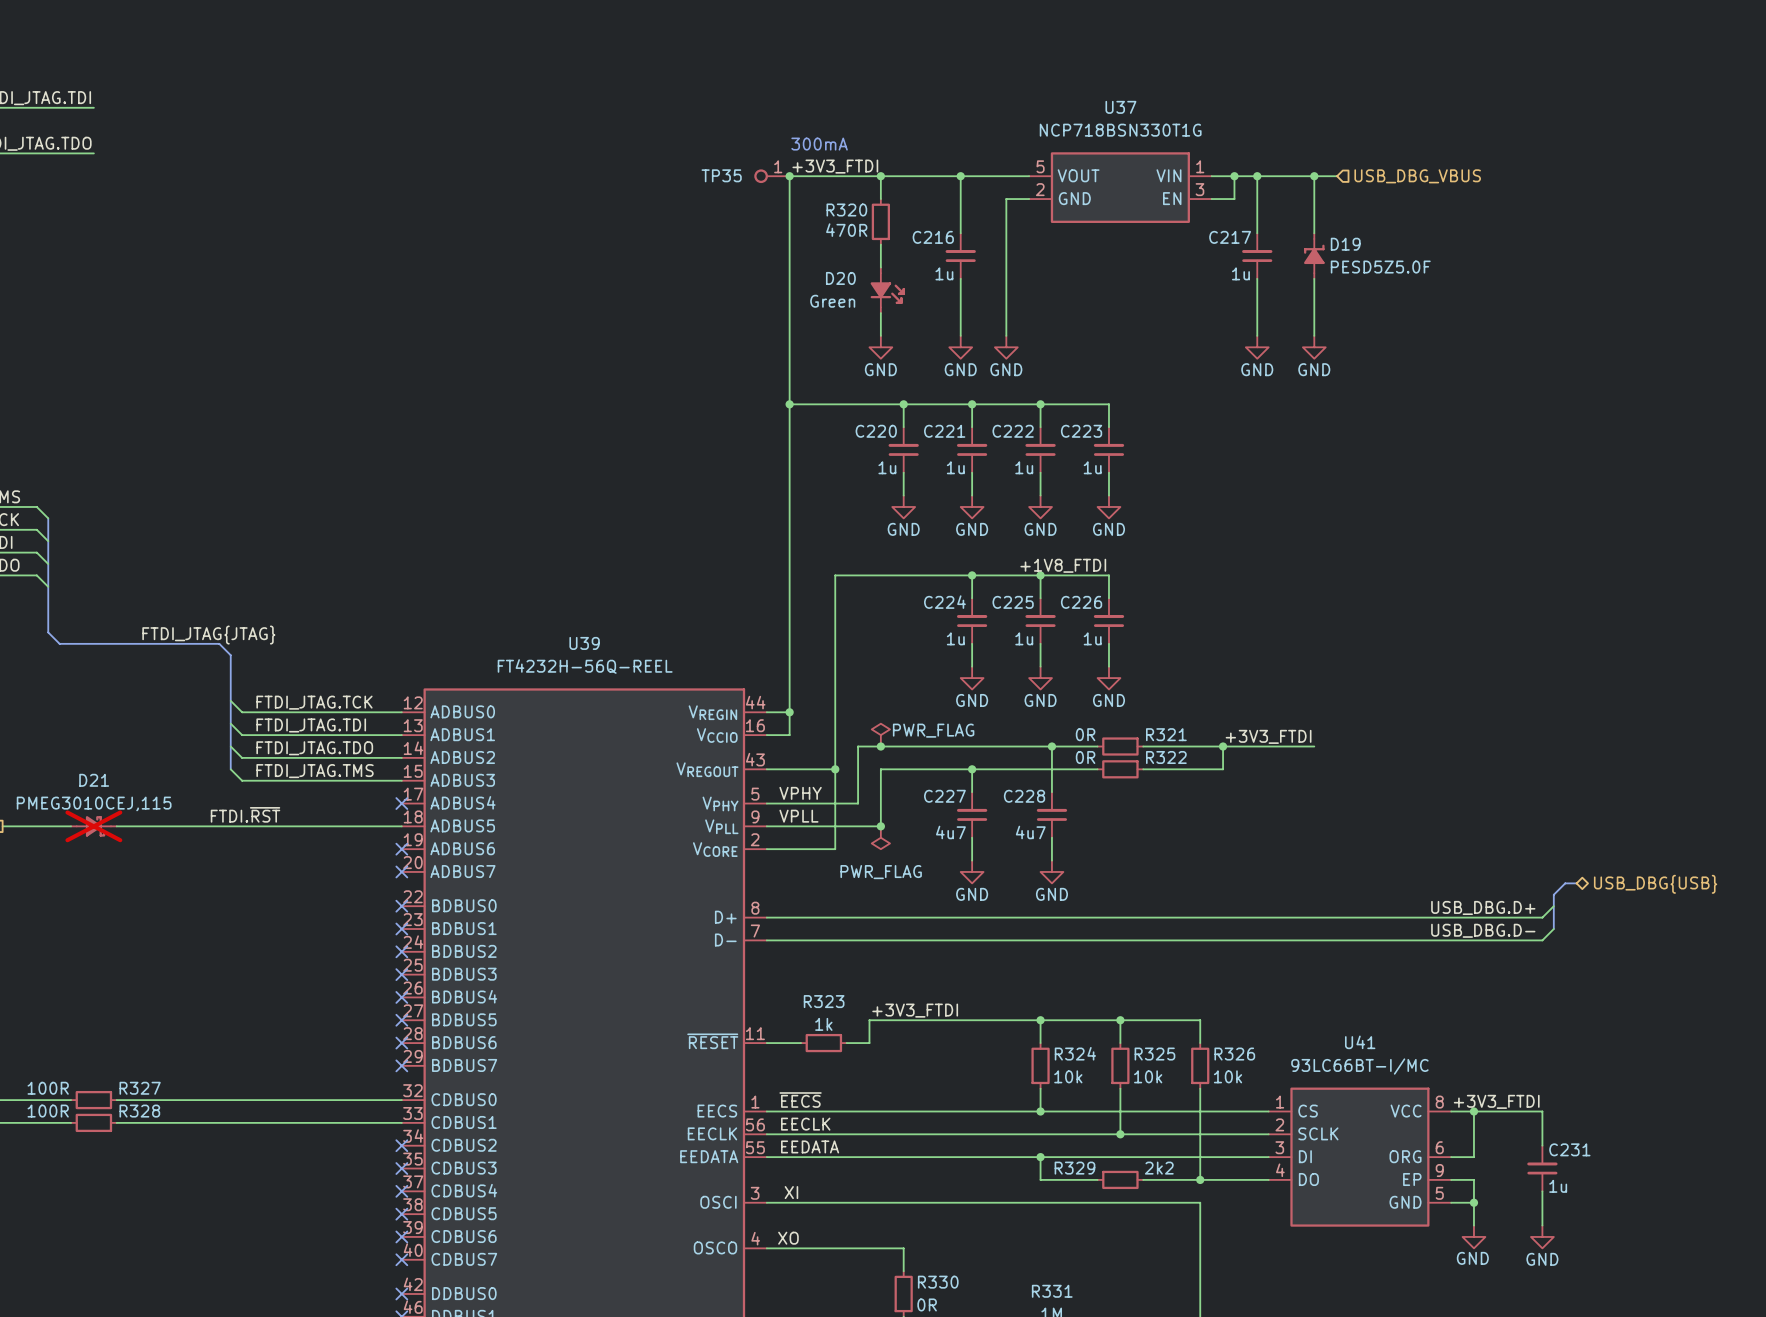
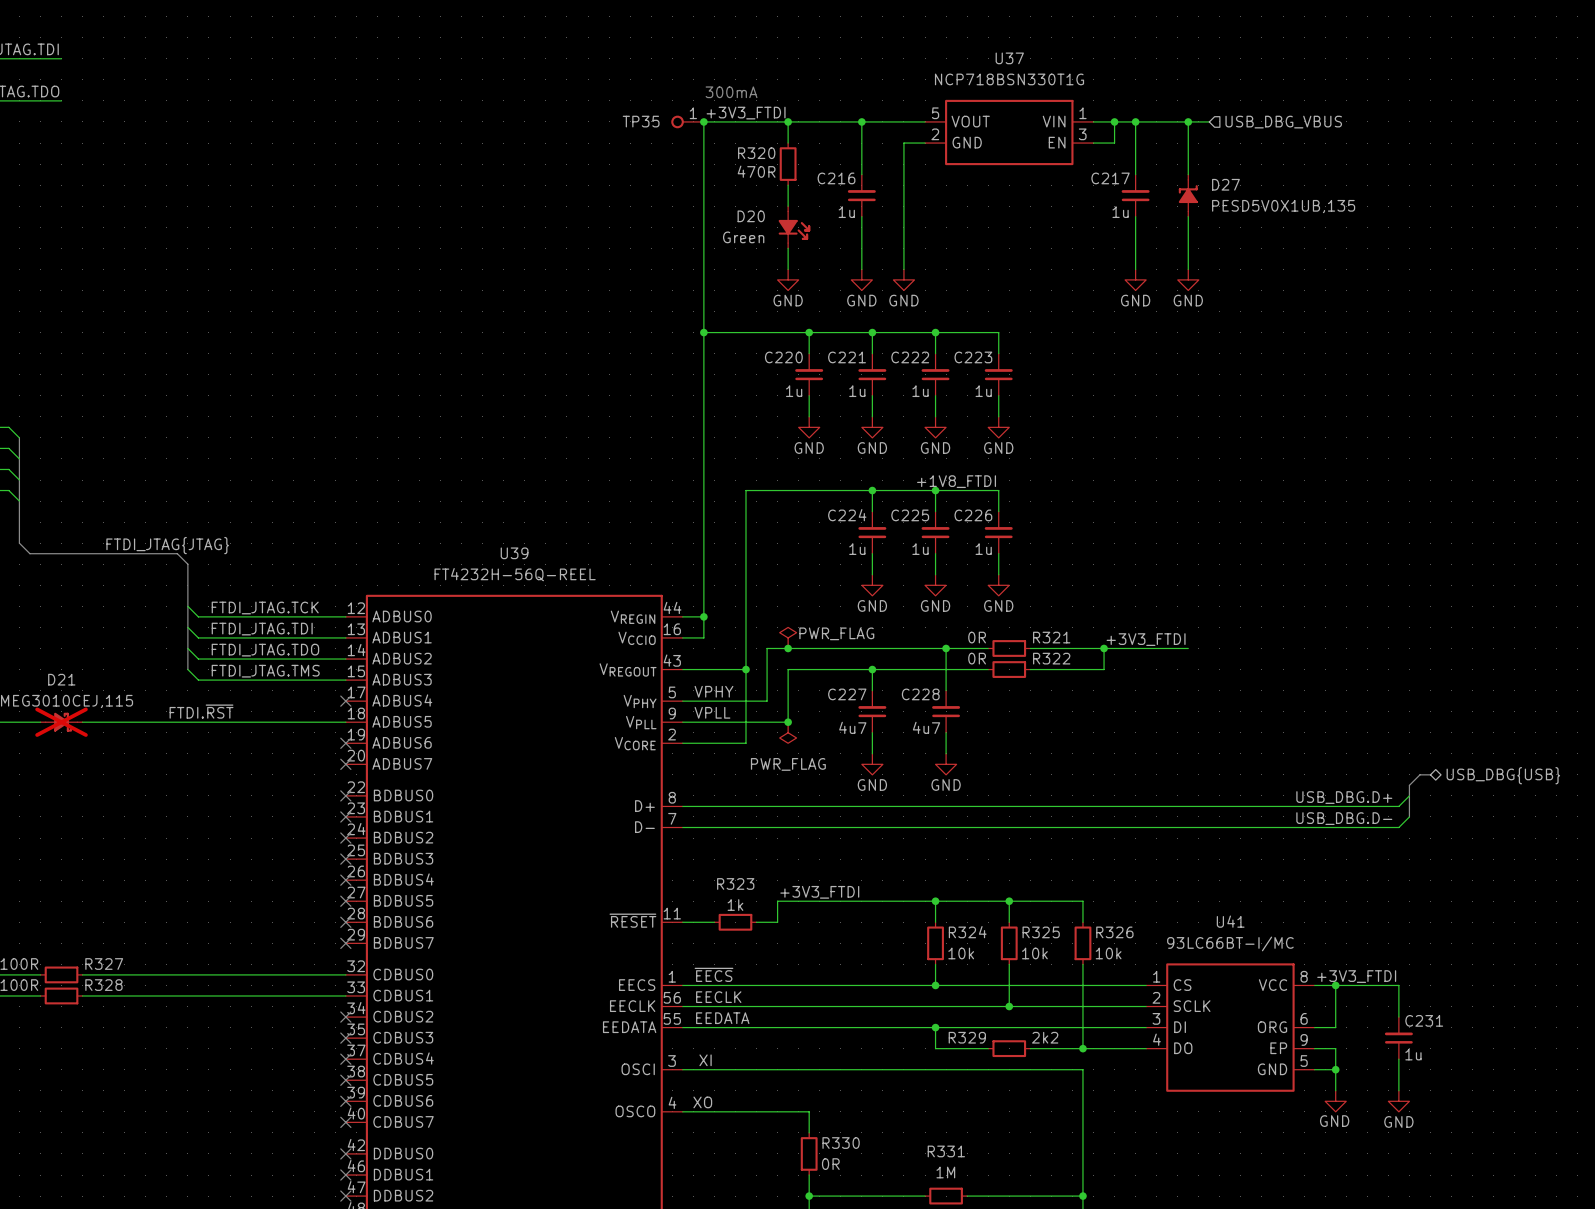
D19 name: D19 (1345, 244) -> D27 (1225, 184)
D19 text: PESD5Z5.0F (1380, 267) -> PESD5V0X1UB,135 (1283, 206)

